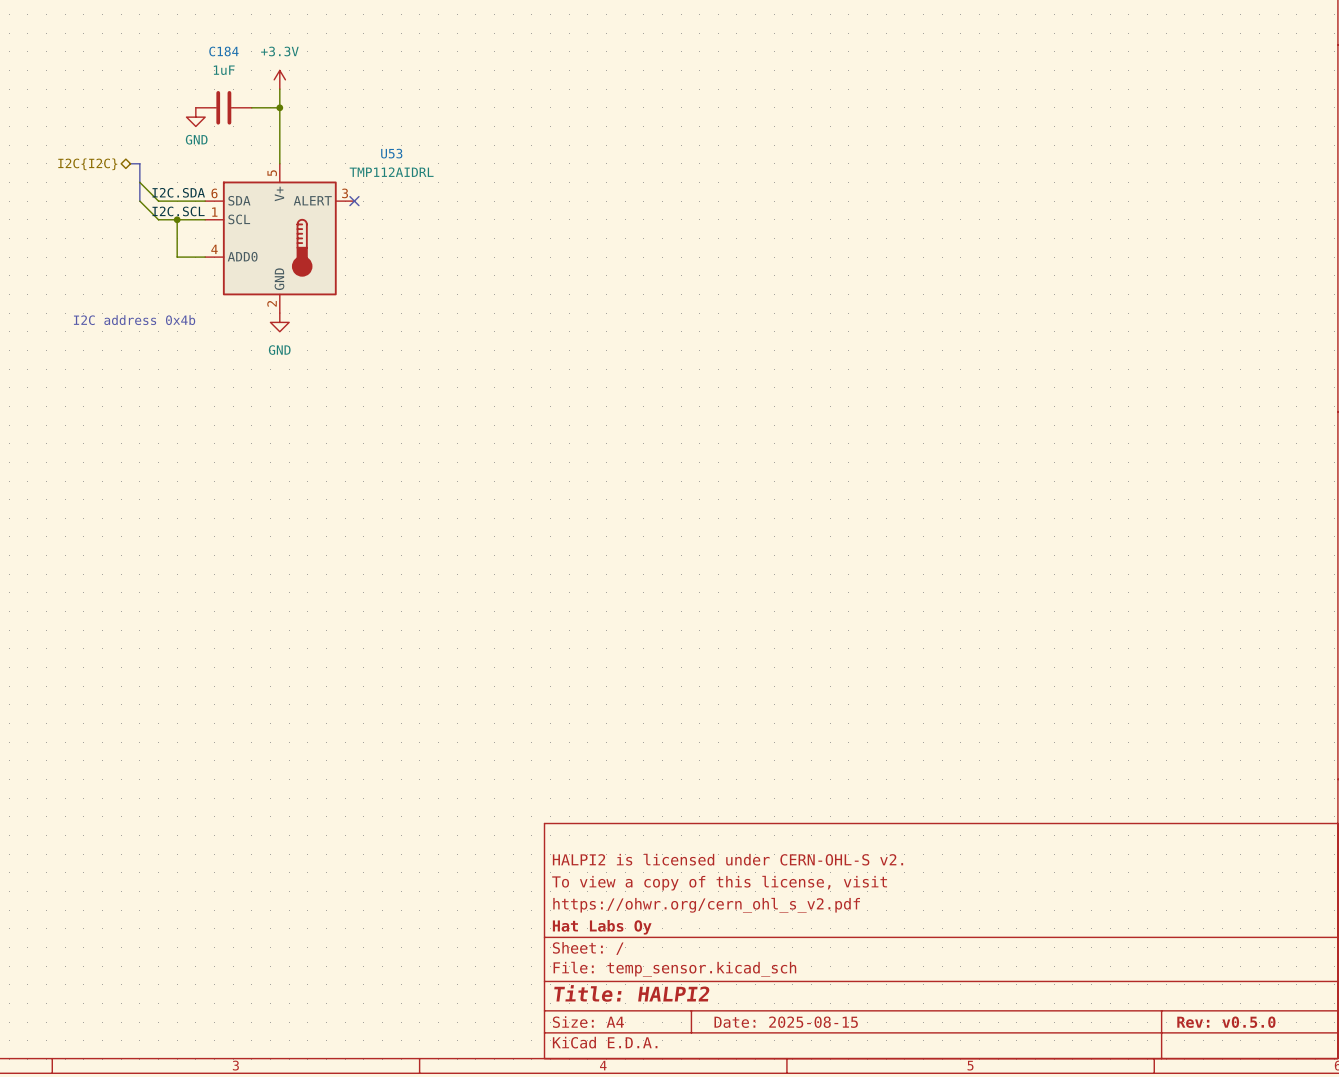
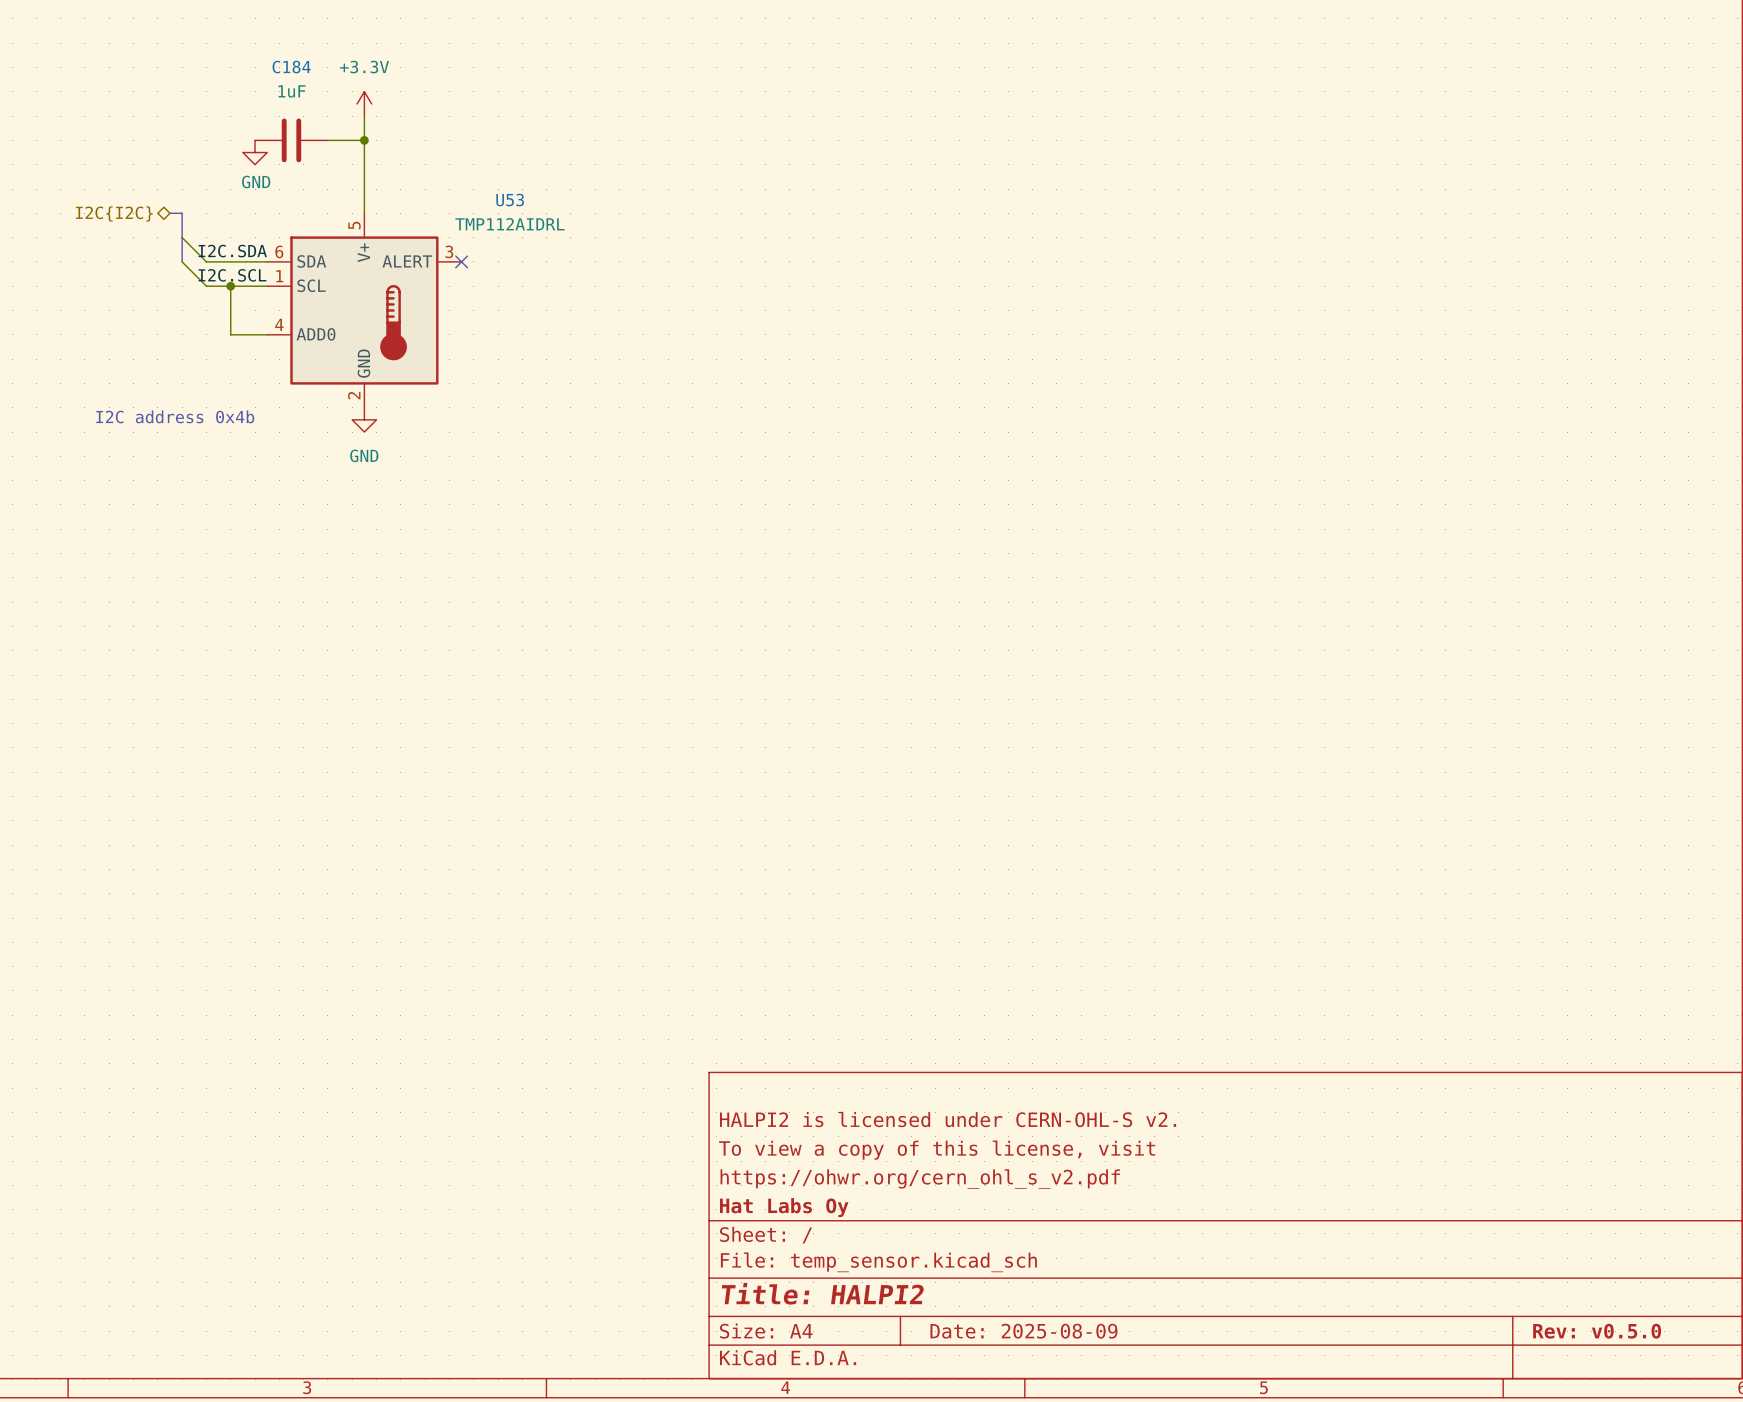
title block: Date: 2025-08-15 (786, 1022) -> Date: 2025-08-09 (1023, 1331)

